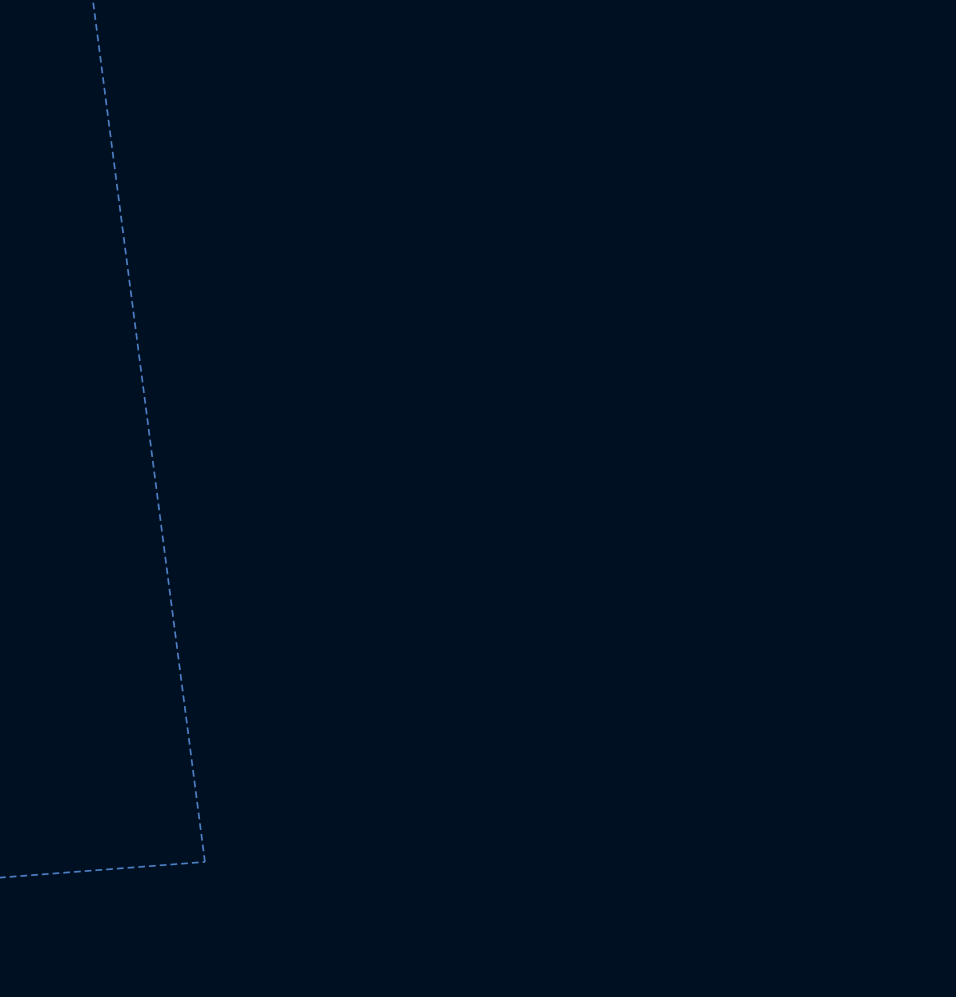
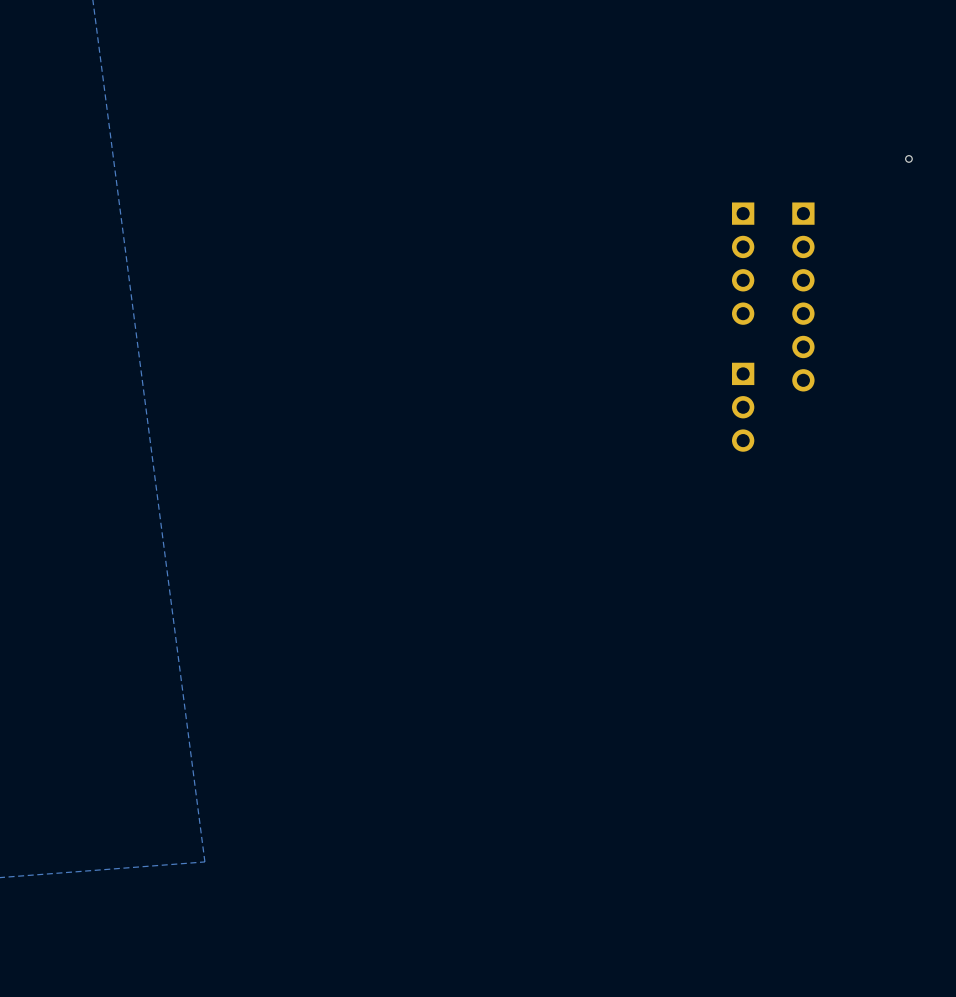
part: none -> (908, 158)
part: none -> (743, 263)
part: none -> (803, 296)
part: none -> (743, 407)

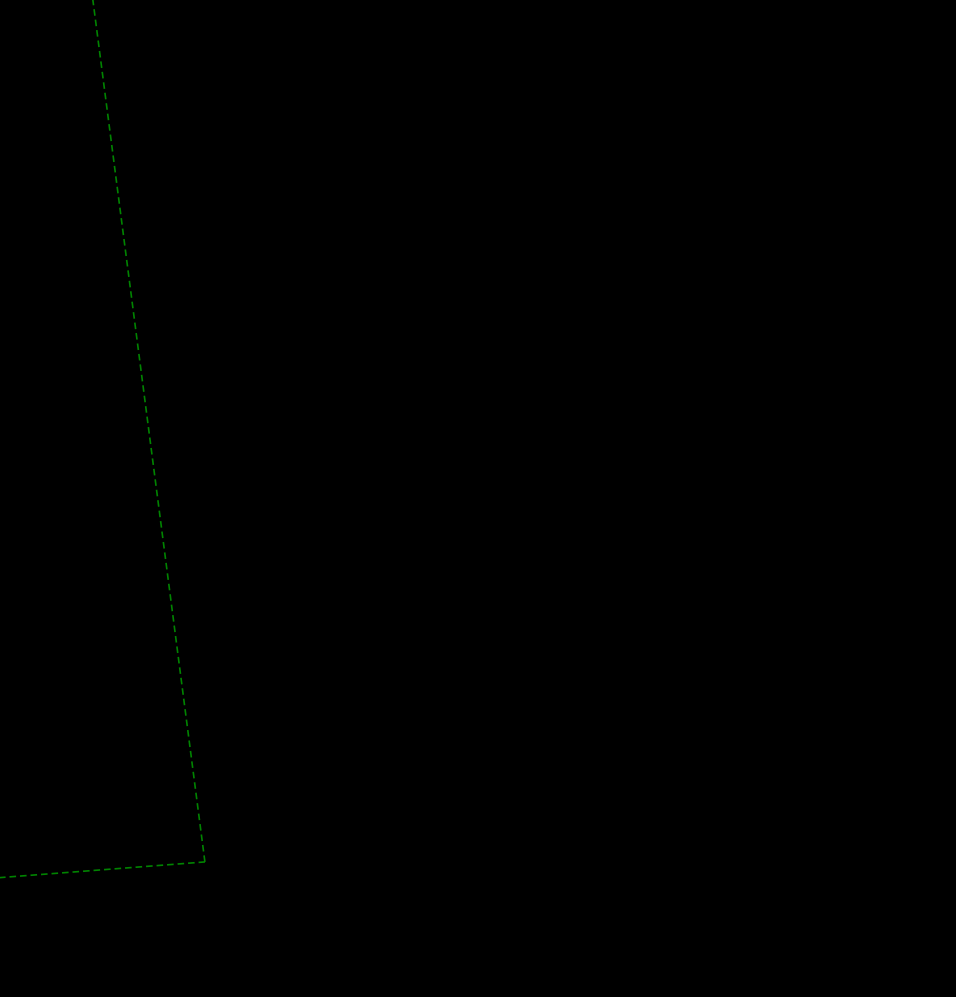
part: (908, 158) -> none
part: (743, 263) -> none
part: (803, 296) -> none
part: (743, 407) -> none

